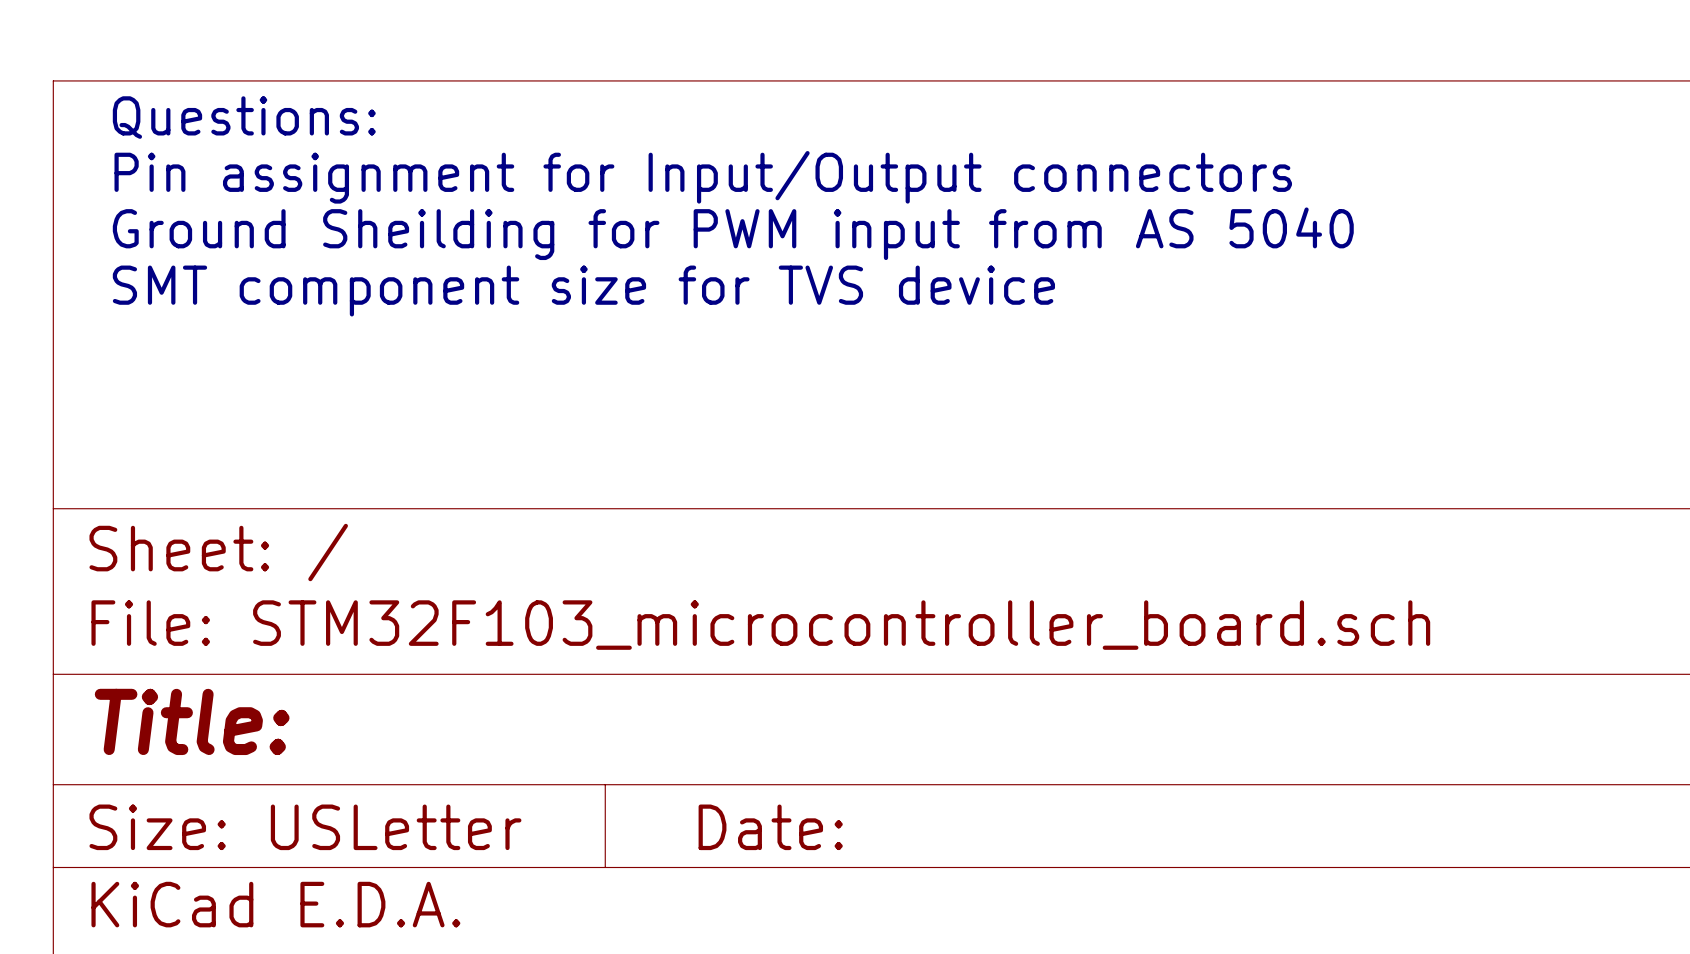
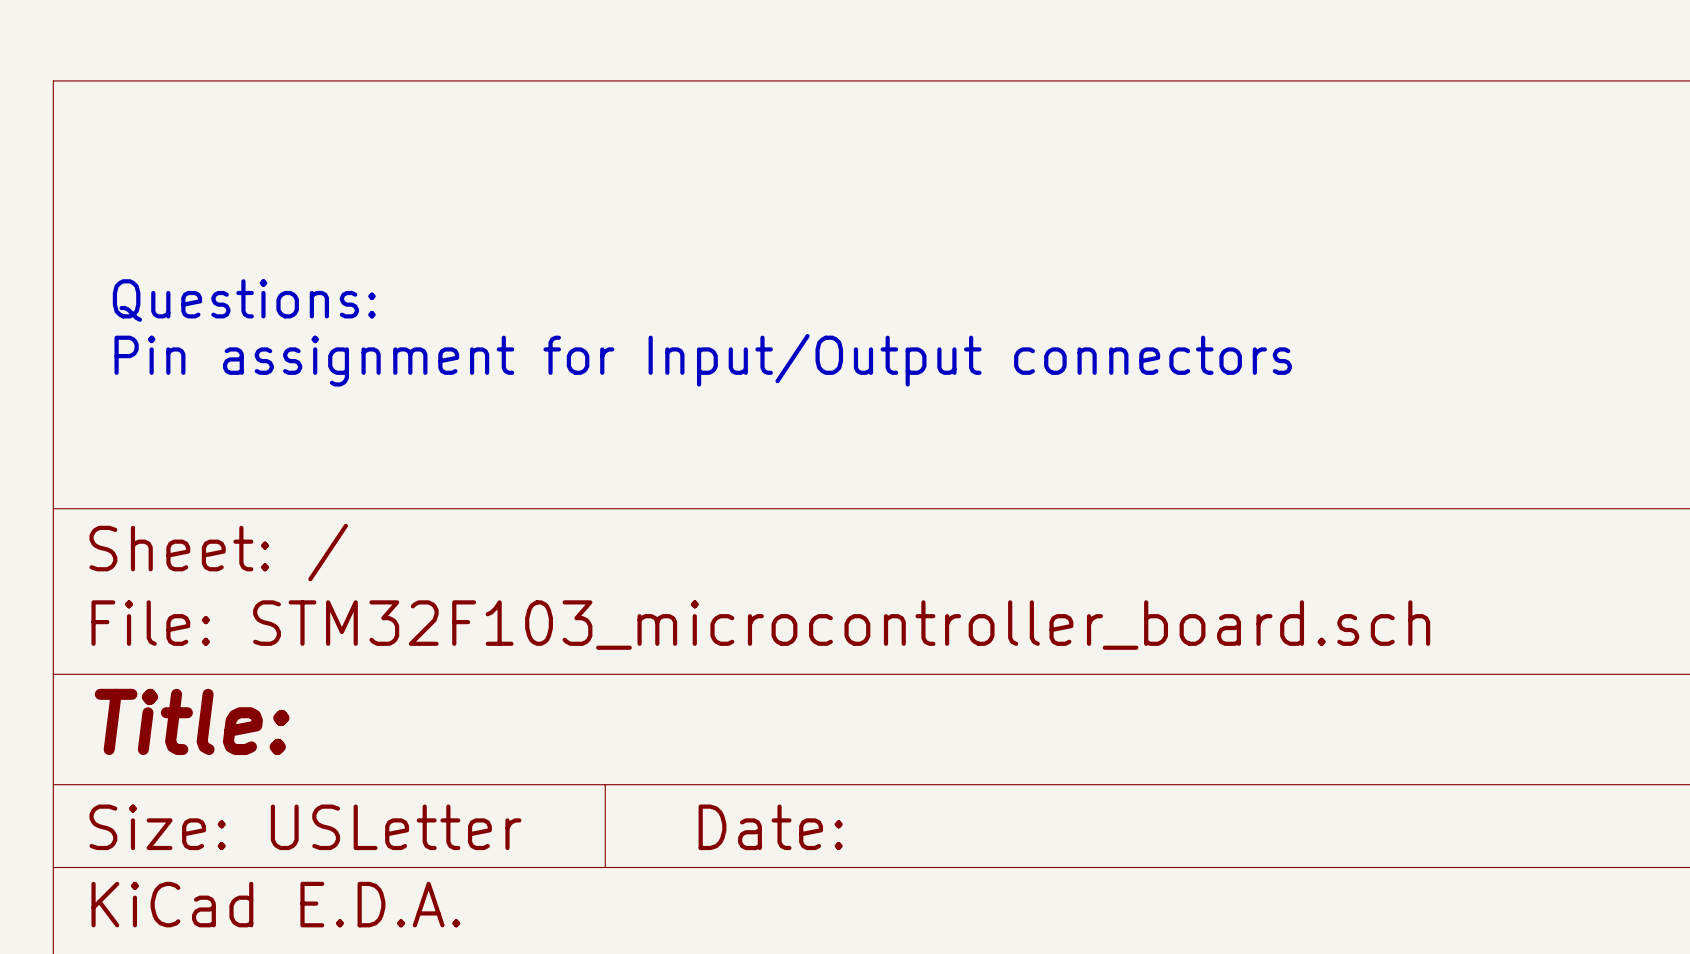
text position: Questions: (244, 117) -> Questions: (244, 300)
text position: Pin assignment for Input/Output connectors (703, 177) -> Pin assignment for Input/Output connectors (703, 360)
text: Ground Sheilding for PWM input from AS 5040 (733, 233) -> none
text: SMT component size for TVS device (583, 291) -> none

